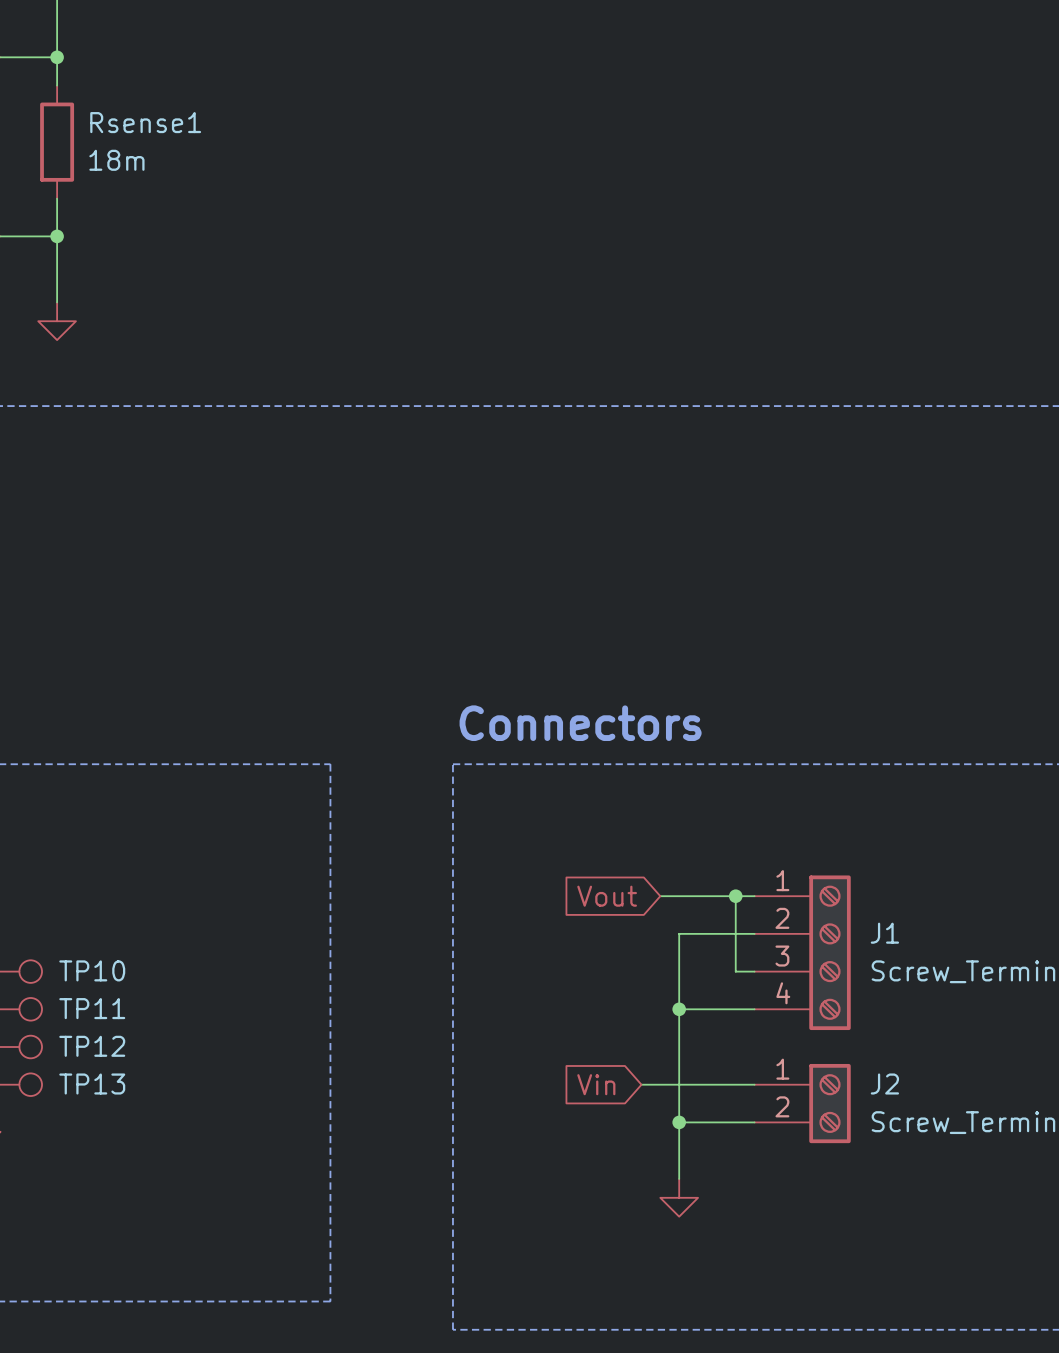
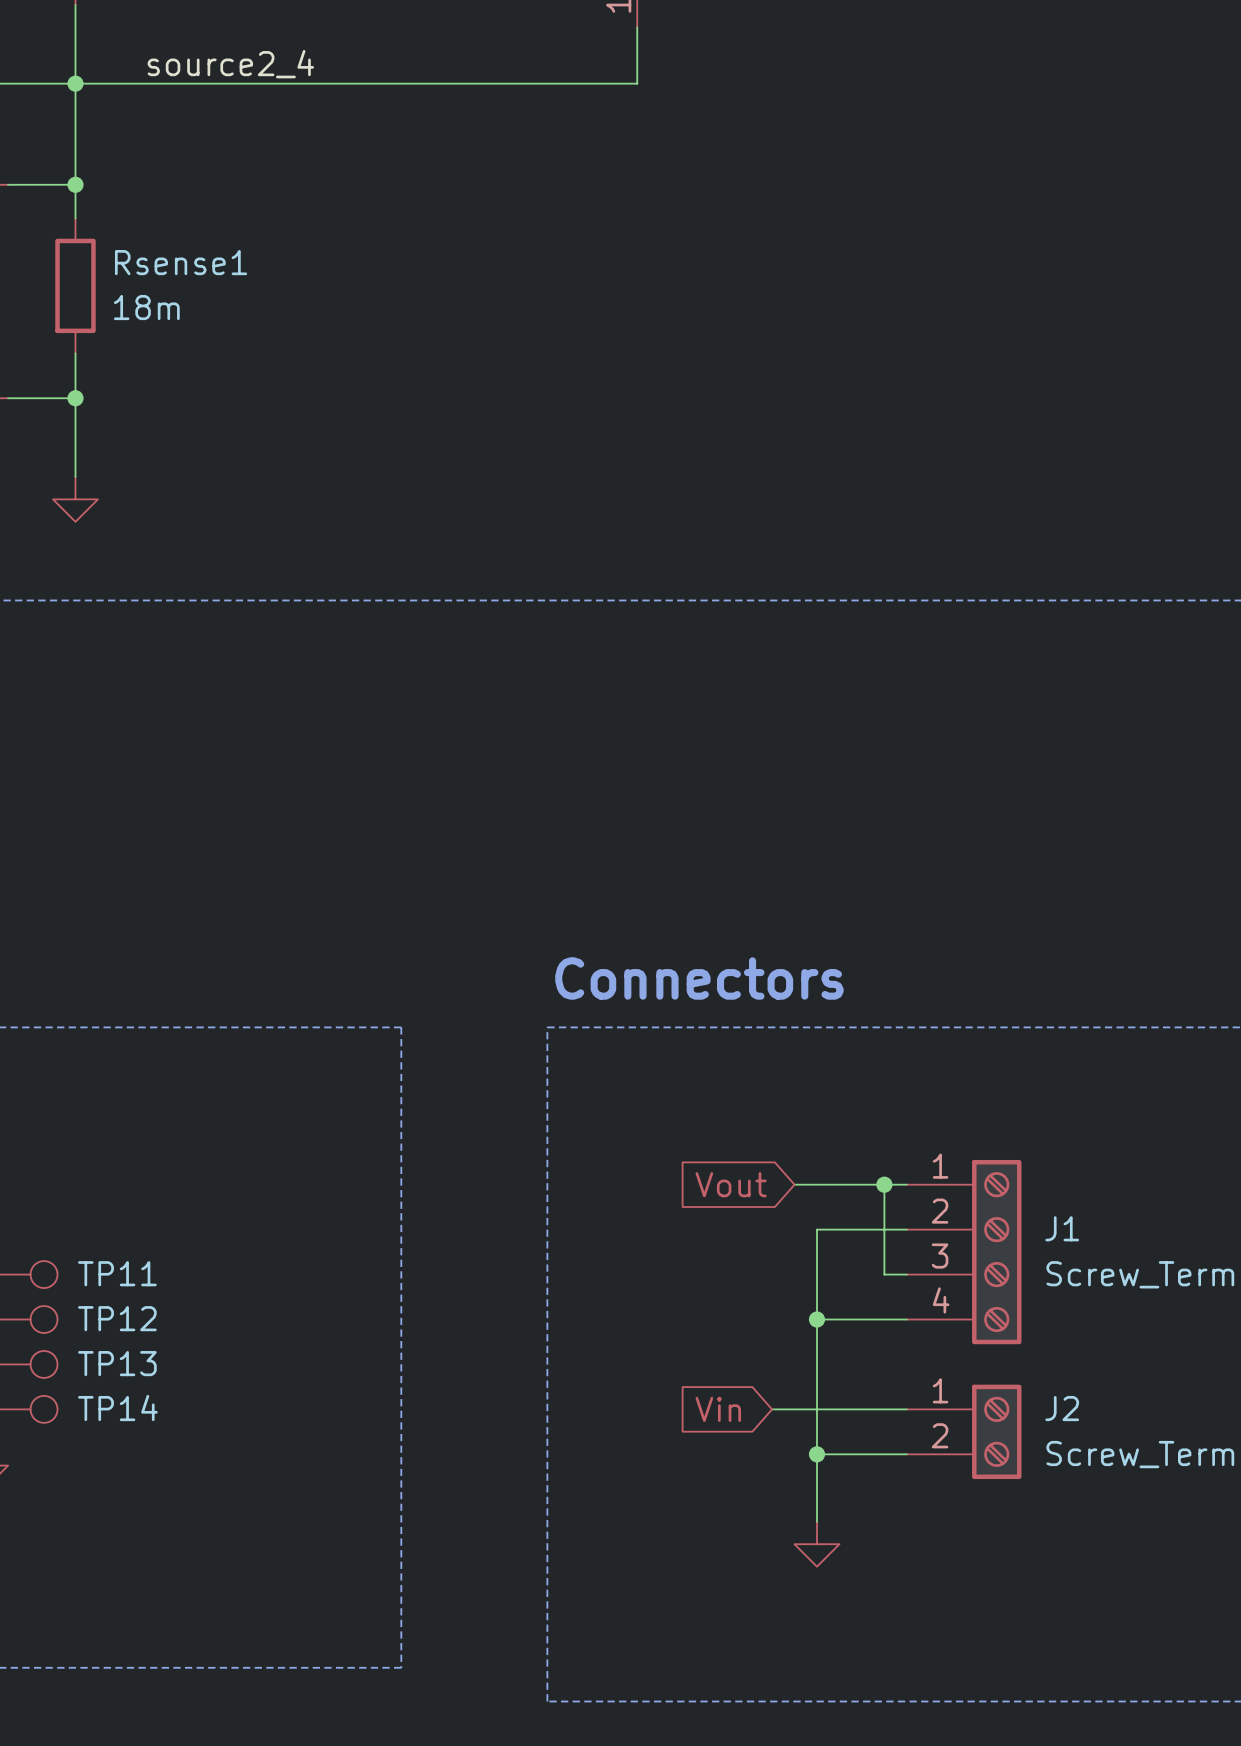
TP10 name: TP10 (92, 970) -> TP11 (117, 1273)
TP11 name: TP11 (92, 1008) -> TP12 (117, 1318)
TP12 name: TP12 (92, 1046) -> TP13 (117, 1363)
TP13 name: TP13 (92, 1084) -> TP14 (117, 1408)

